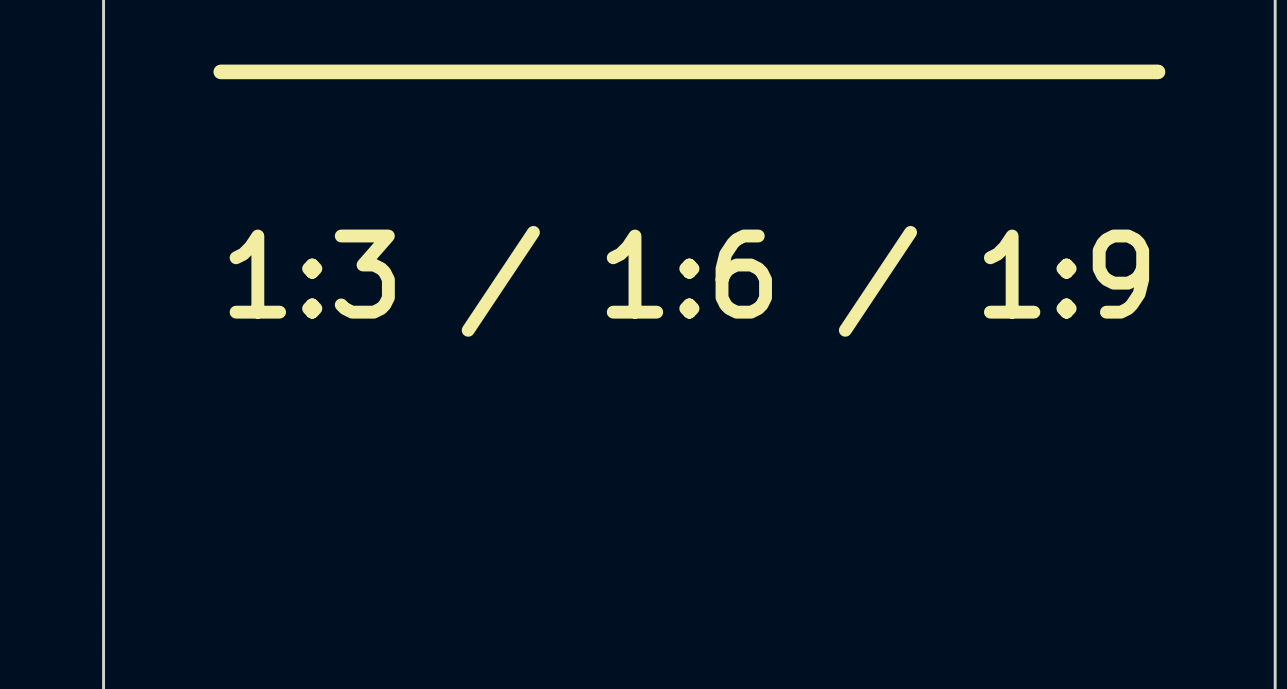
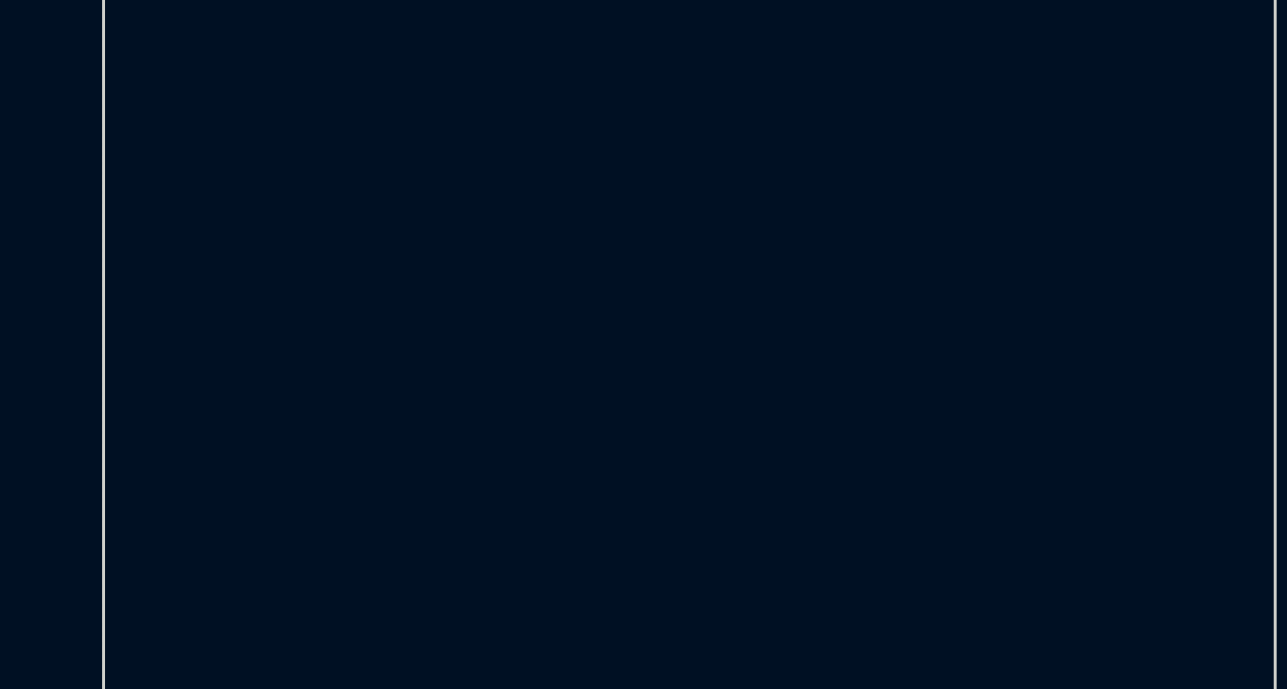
line: (220, 71) (1158, 71) -> none
text: 1:3 / 1:6 / 1:9 (689, 281) -> none

